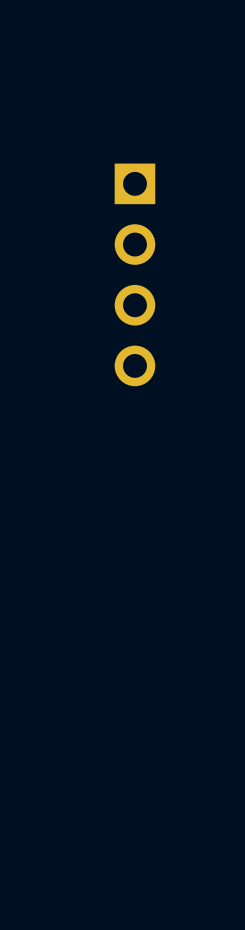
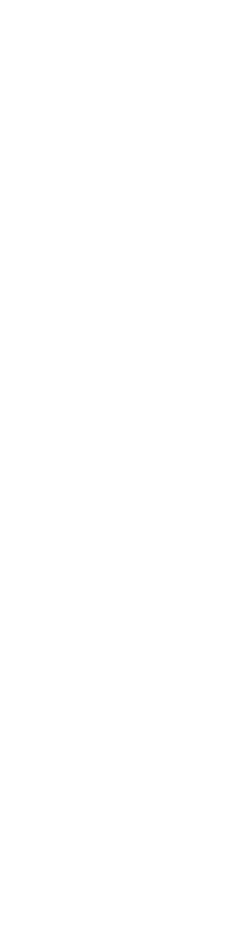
part: (134, 274) -> none

